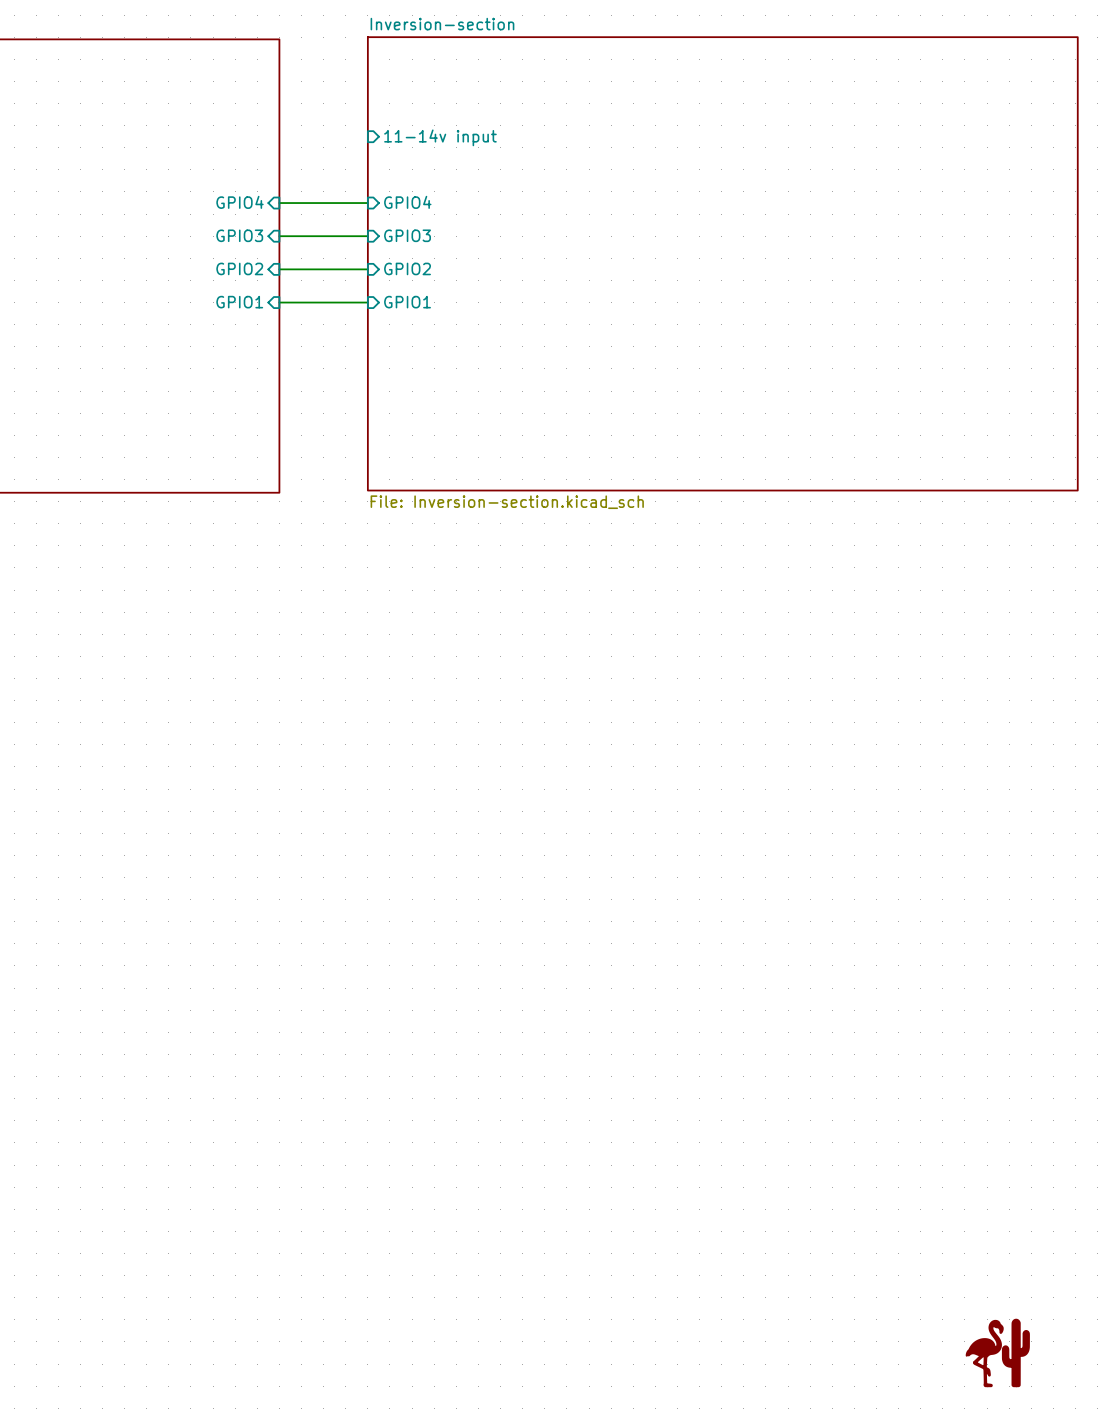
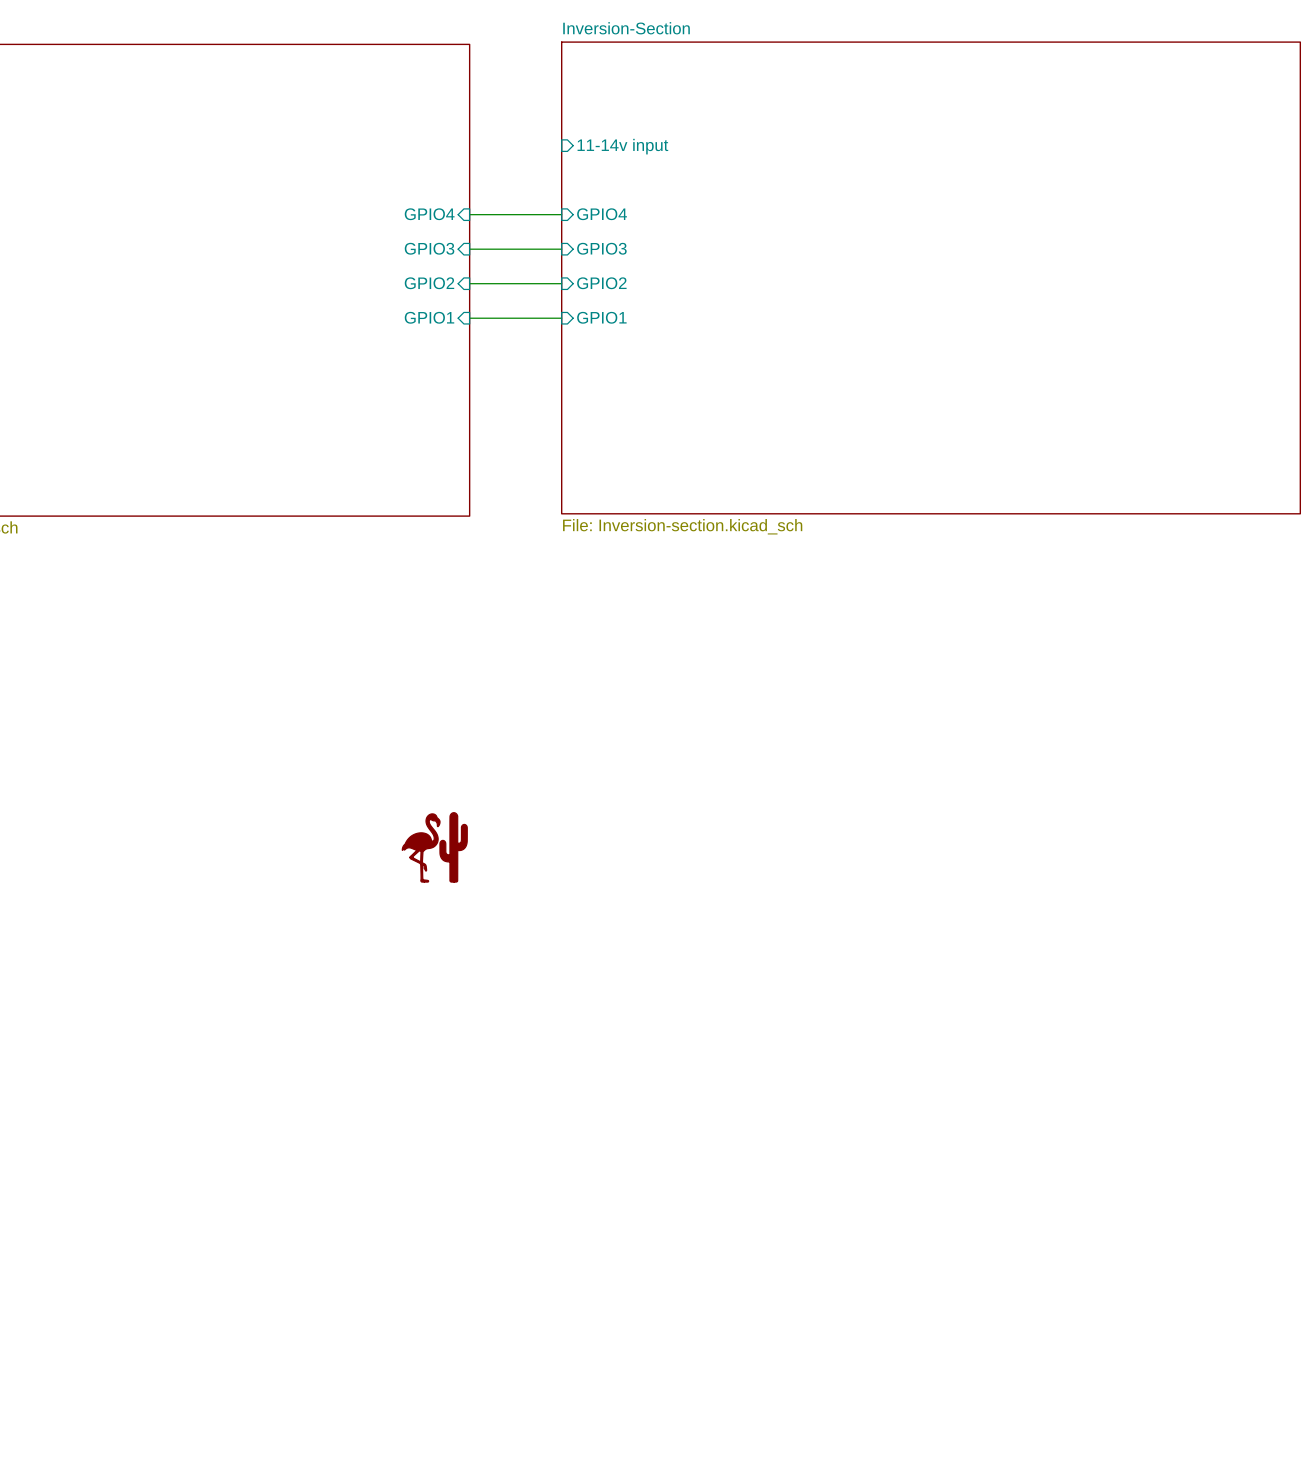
sheet Inversion-section name: Inversion-section (442, 24) -> Inversion-Section (626, 28)
power symbol: none -> (434, 847)
power symbol: (997, 1352) -> none

